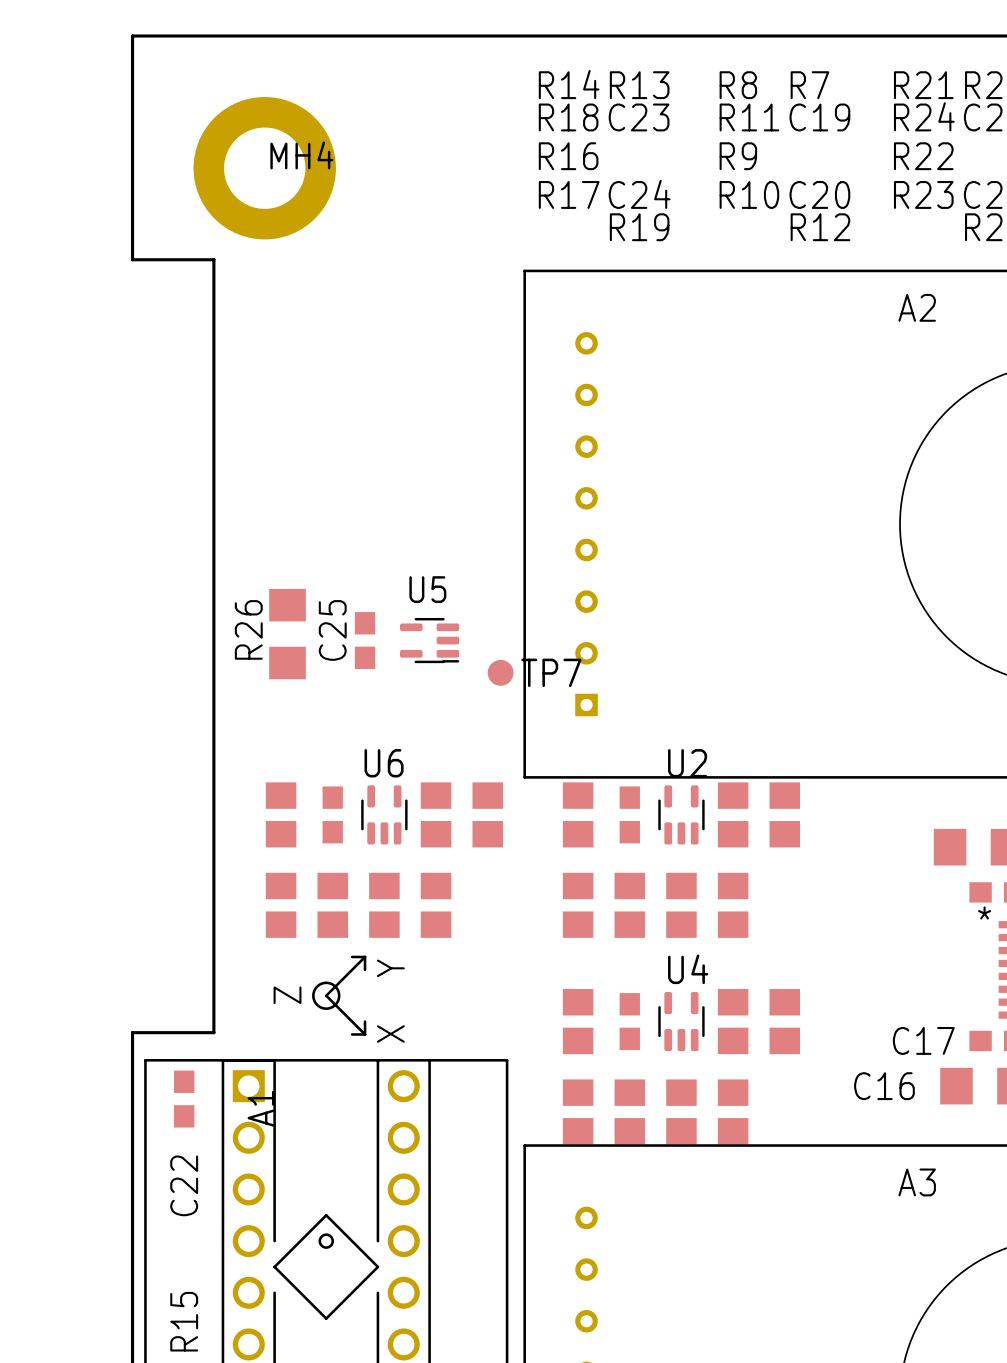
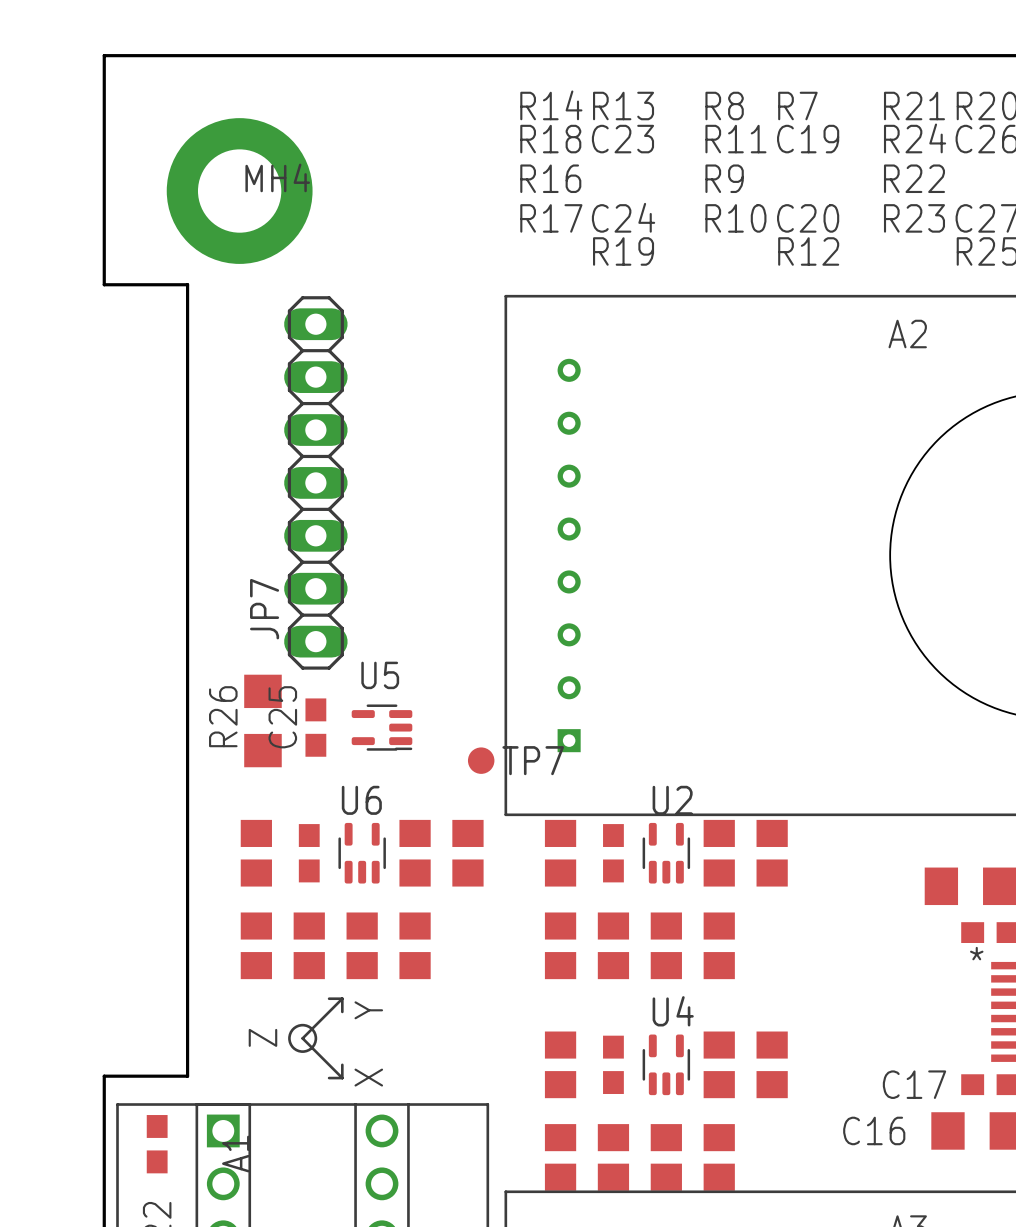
JP7: none -> (315, 482)
R26 position: (287, 634) -> (262, 720)
C25 position: (365, 640) -> (315, 727)
U5 position: (429, 640) -> (382, 727)
TP7 position: (500, 672) -> (481, 760)

